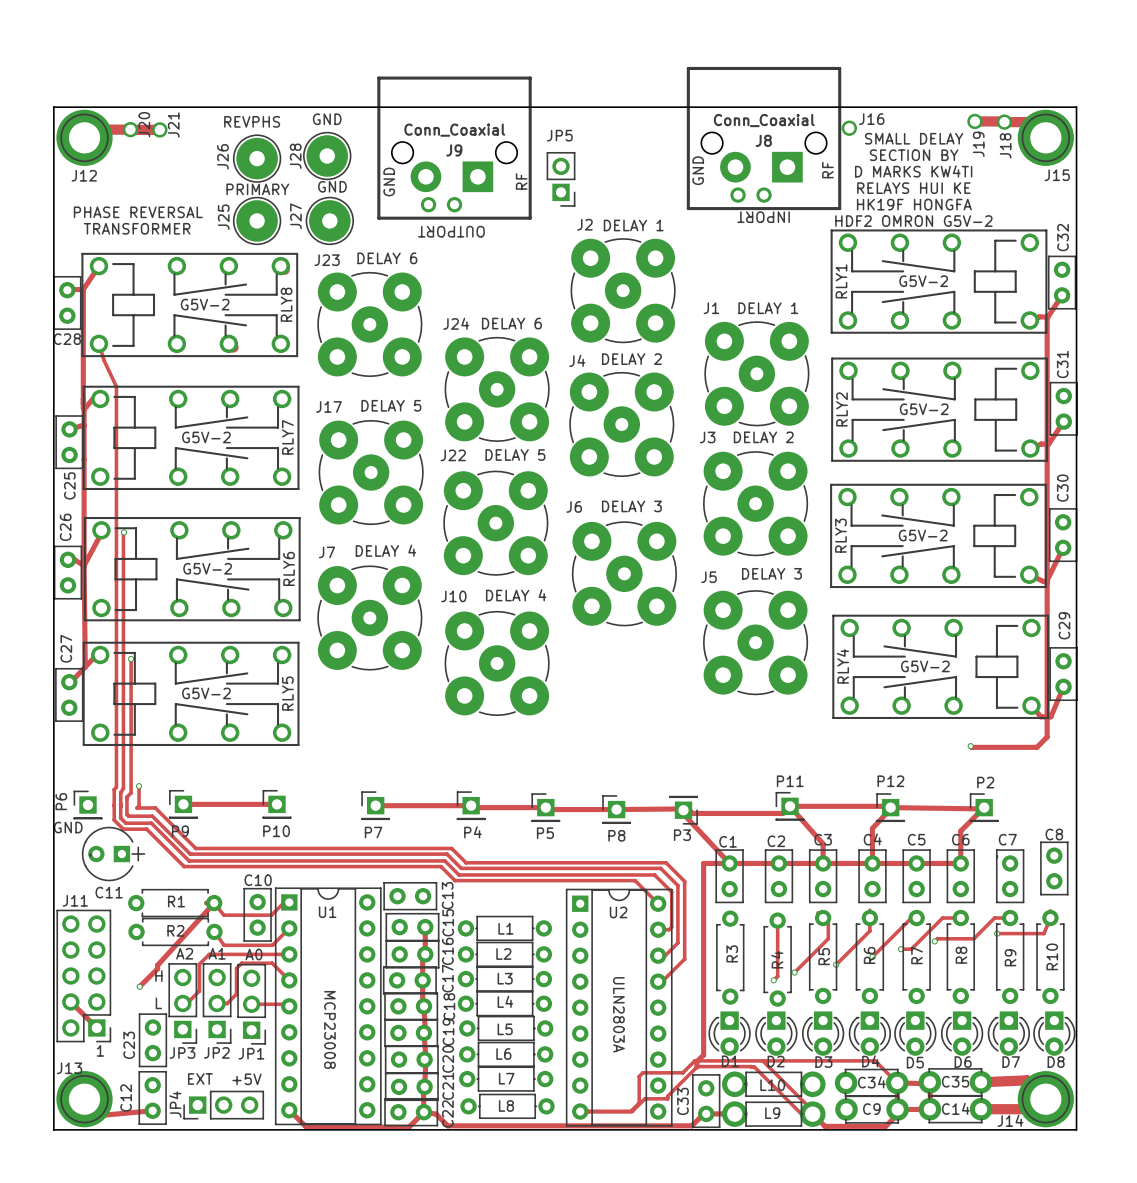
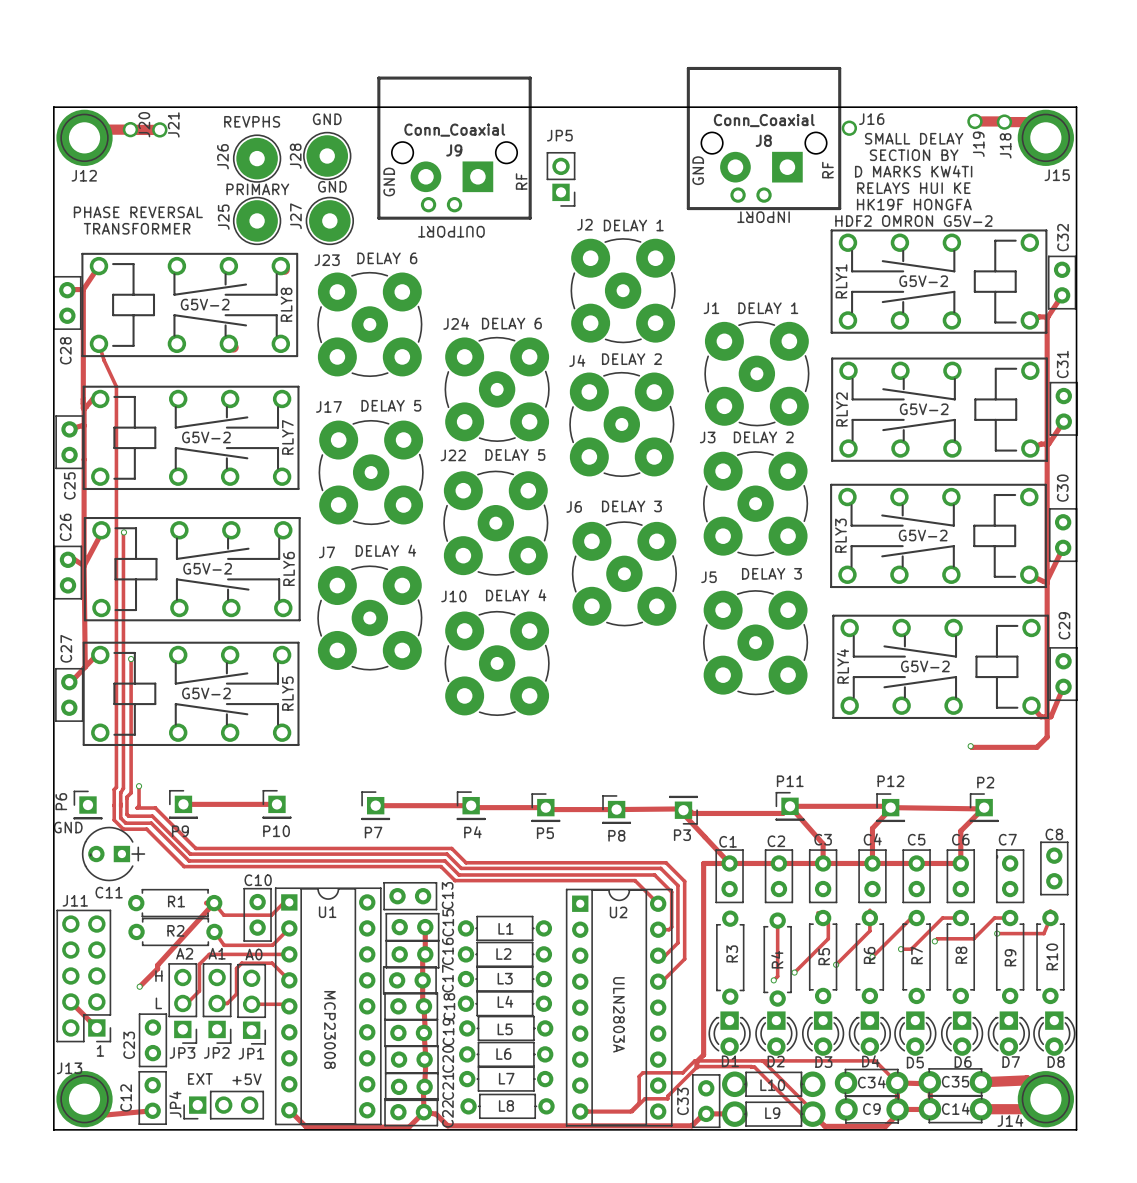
C28 name rotation: 0° (67, 339) -> 90° counterclockwise (65, 350)

